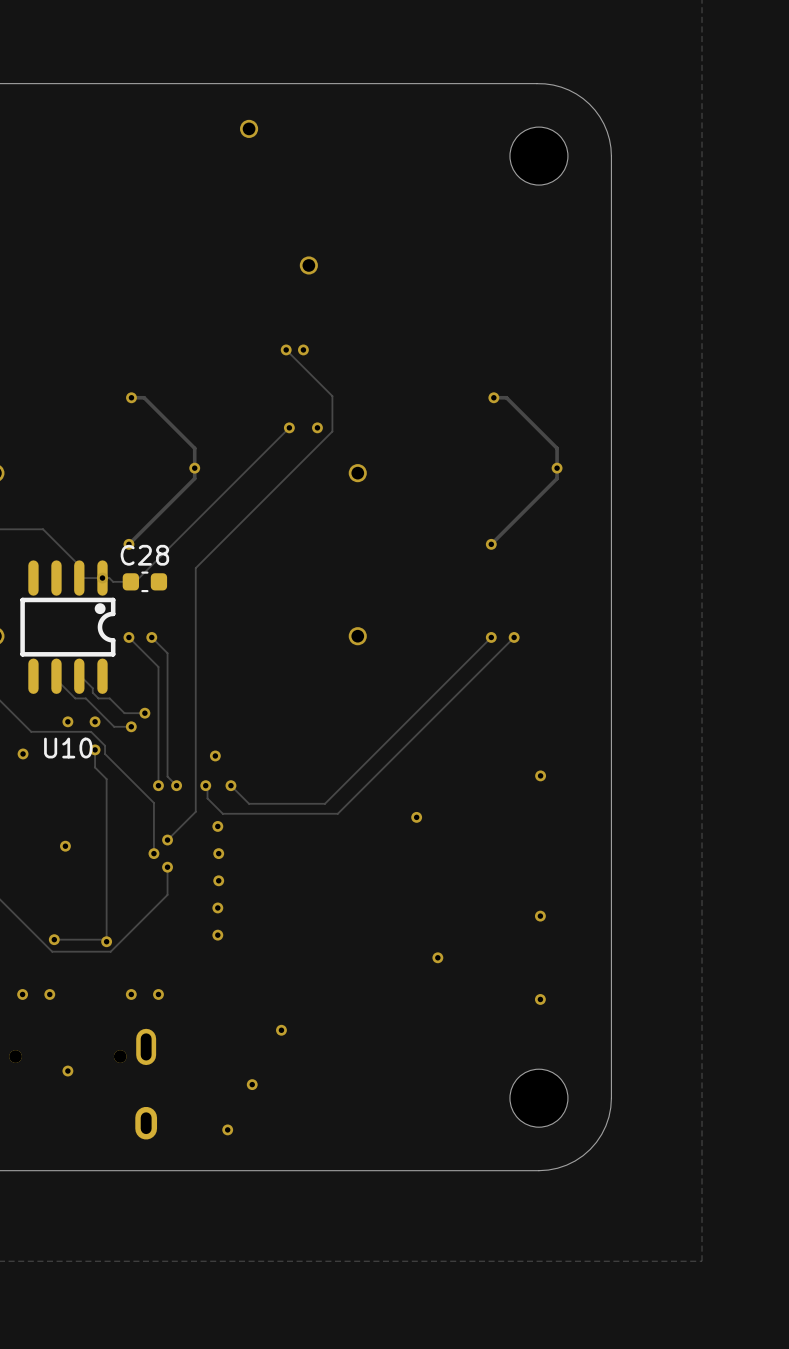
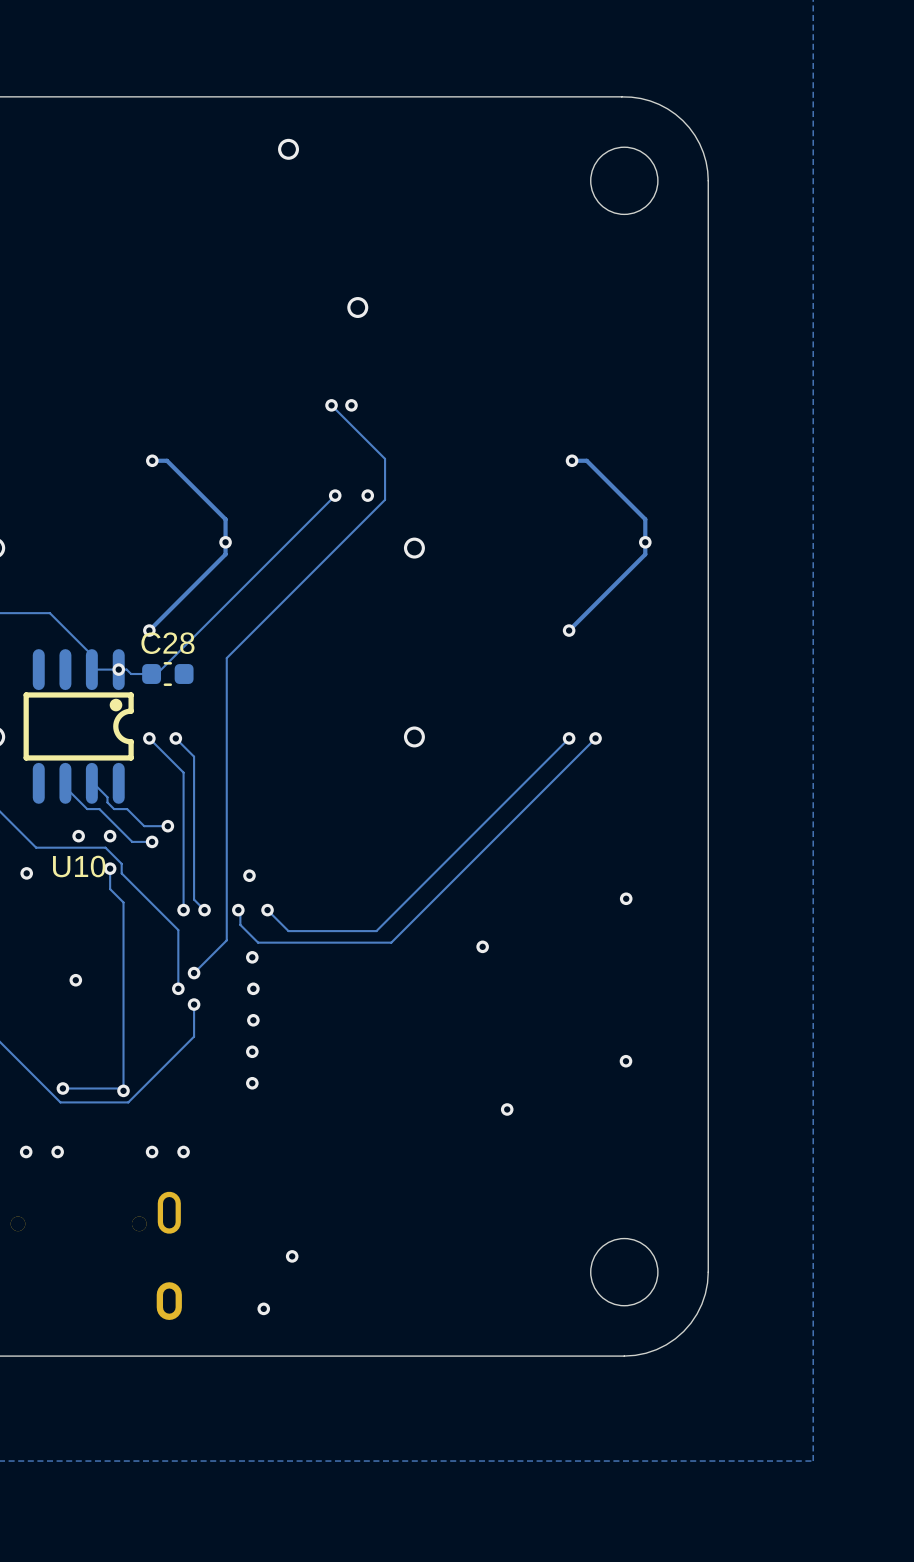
via: (540, 999) -> none
via: (281, 1030) -> none
via: (67, 1071) -> none

